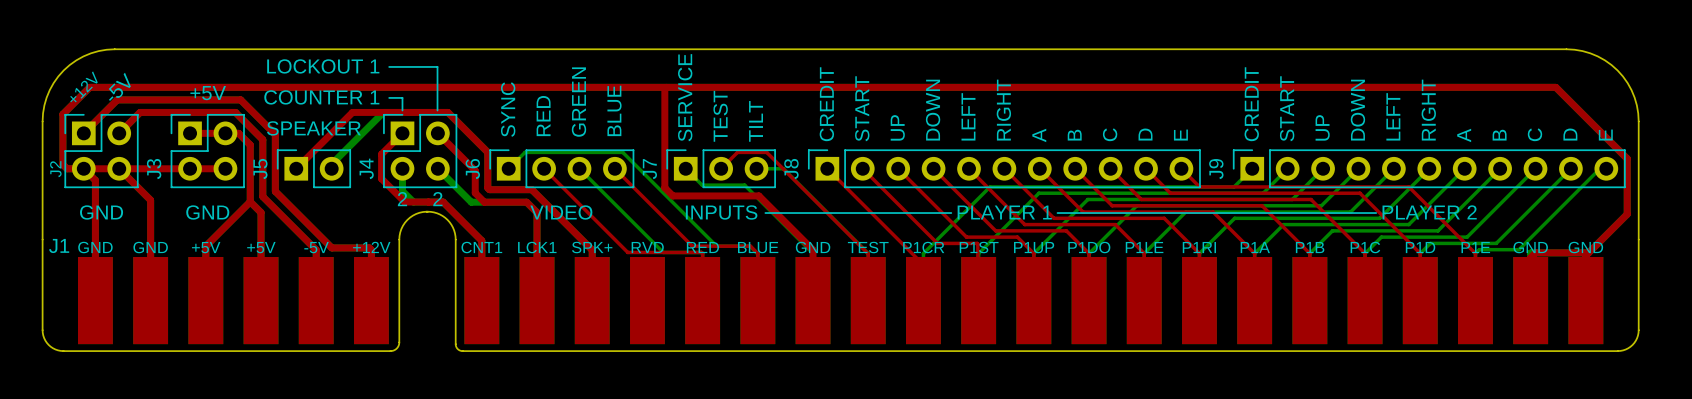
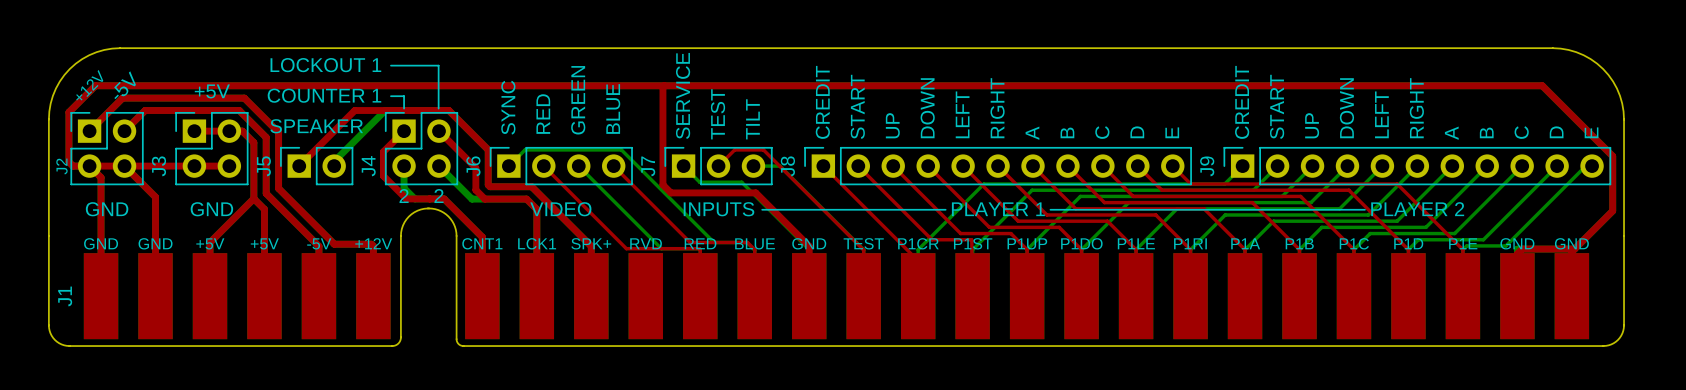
J1 name rotation: 0° (59, 245) -> 90° counterclockwise (65, 296)
J1 name position: J1 (59, 245) -> J1 (65, 296)

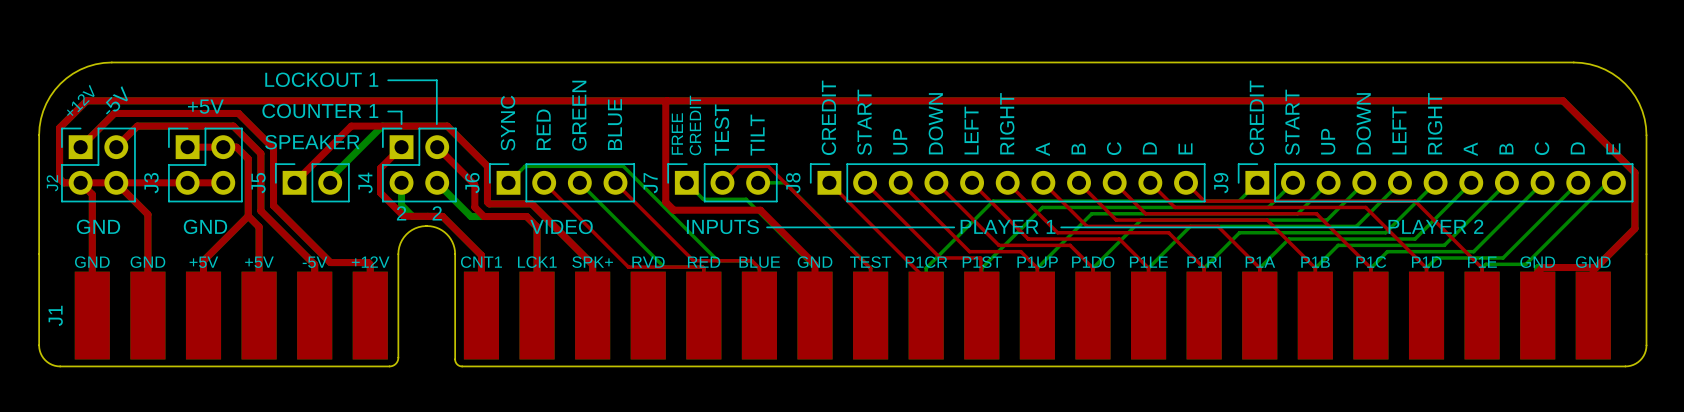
text: SERVICE (683, 95) -> none
text: none -> CREDIT (695, 125)
text: none -> FREE (677, 133)

